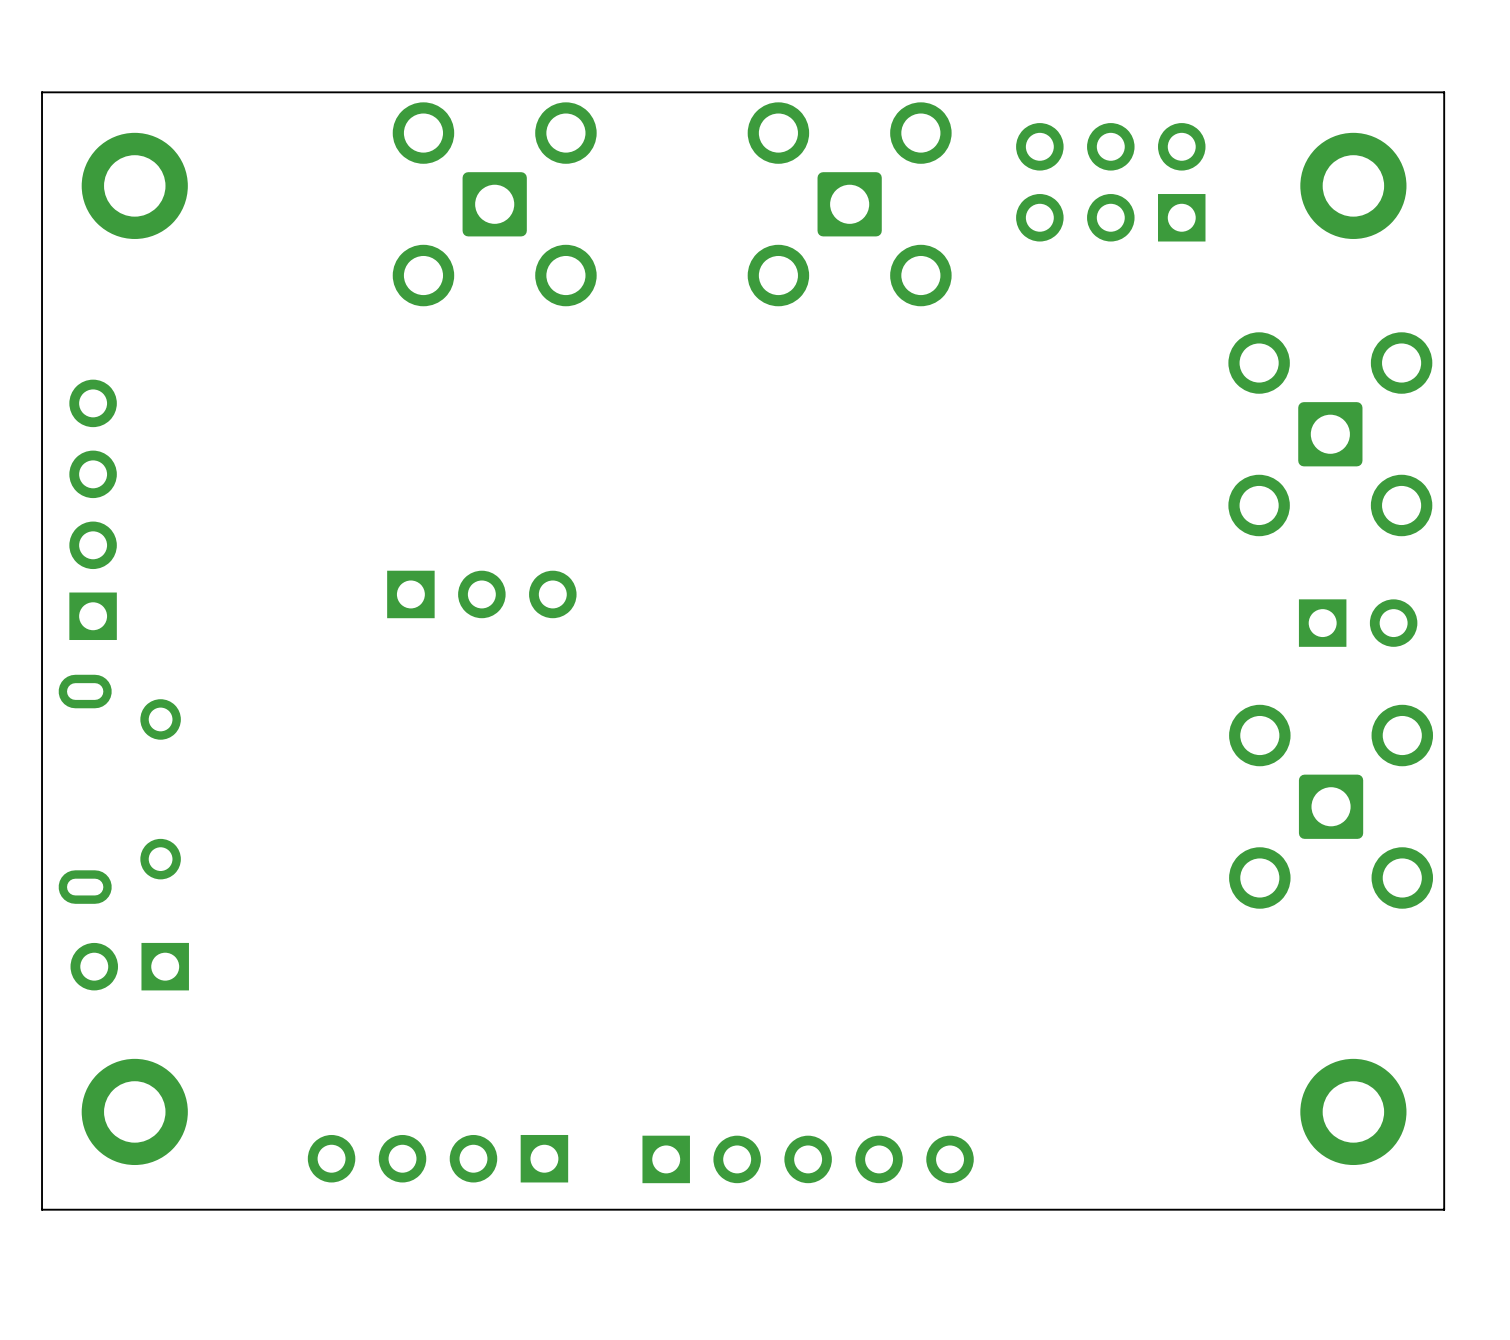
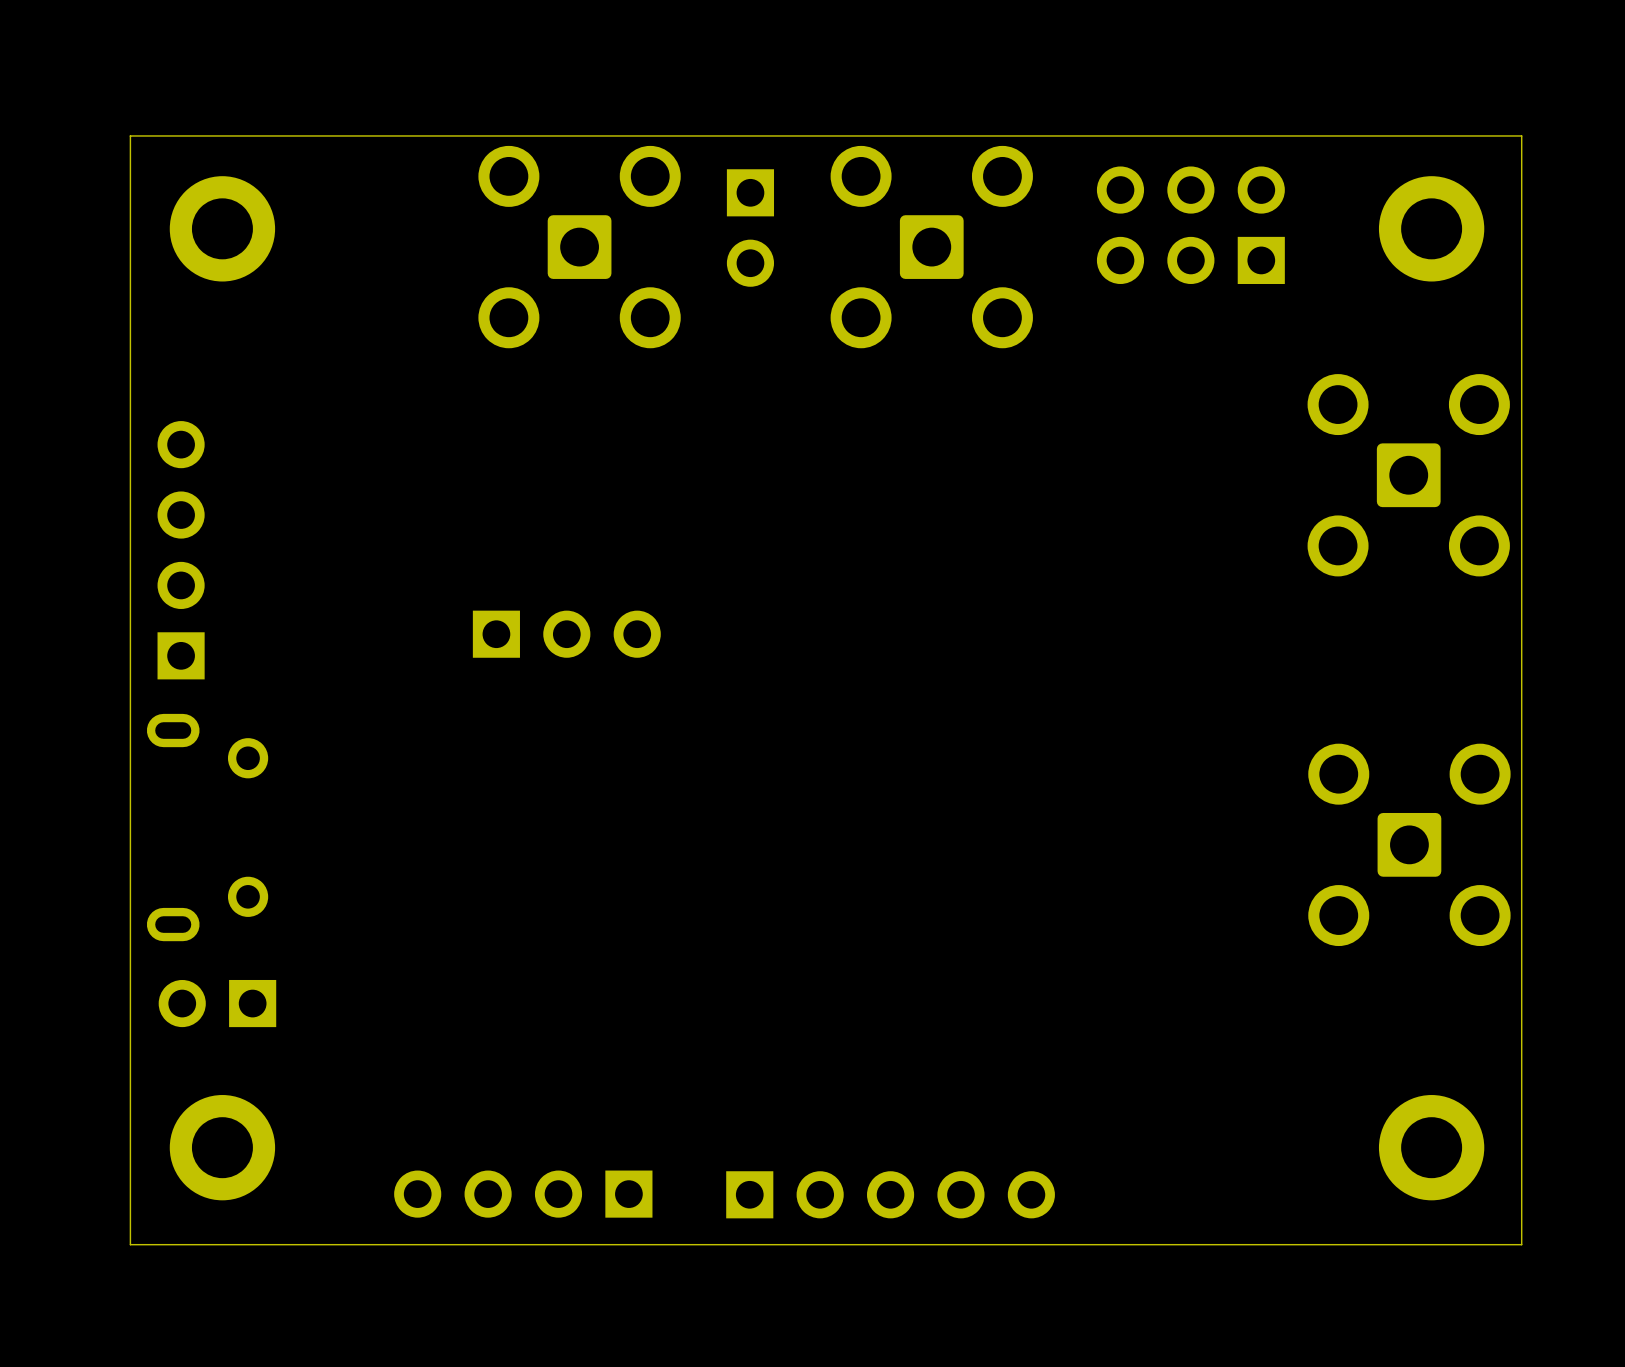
part: none -> (750, 228)
part: (1358, 623) -> none

